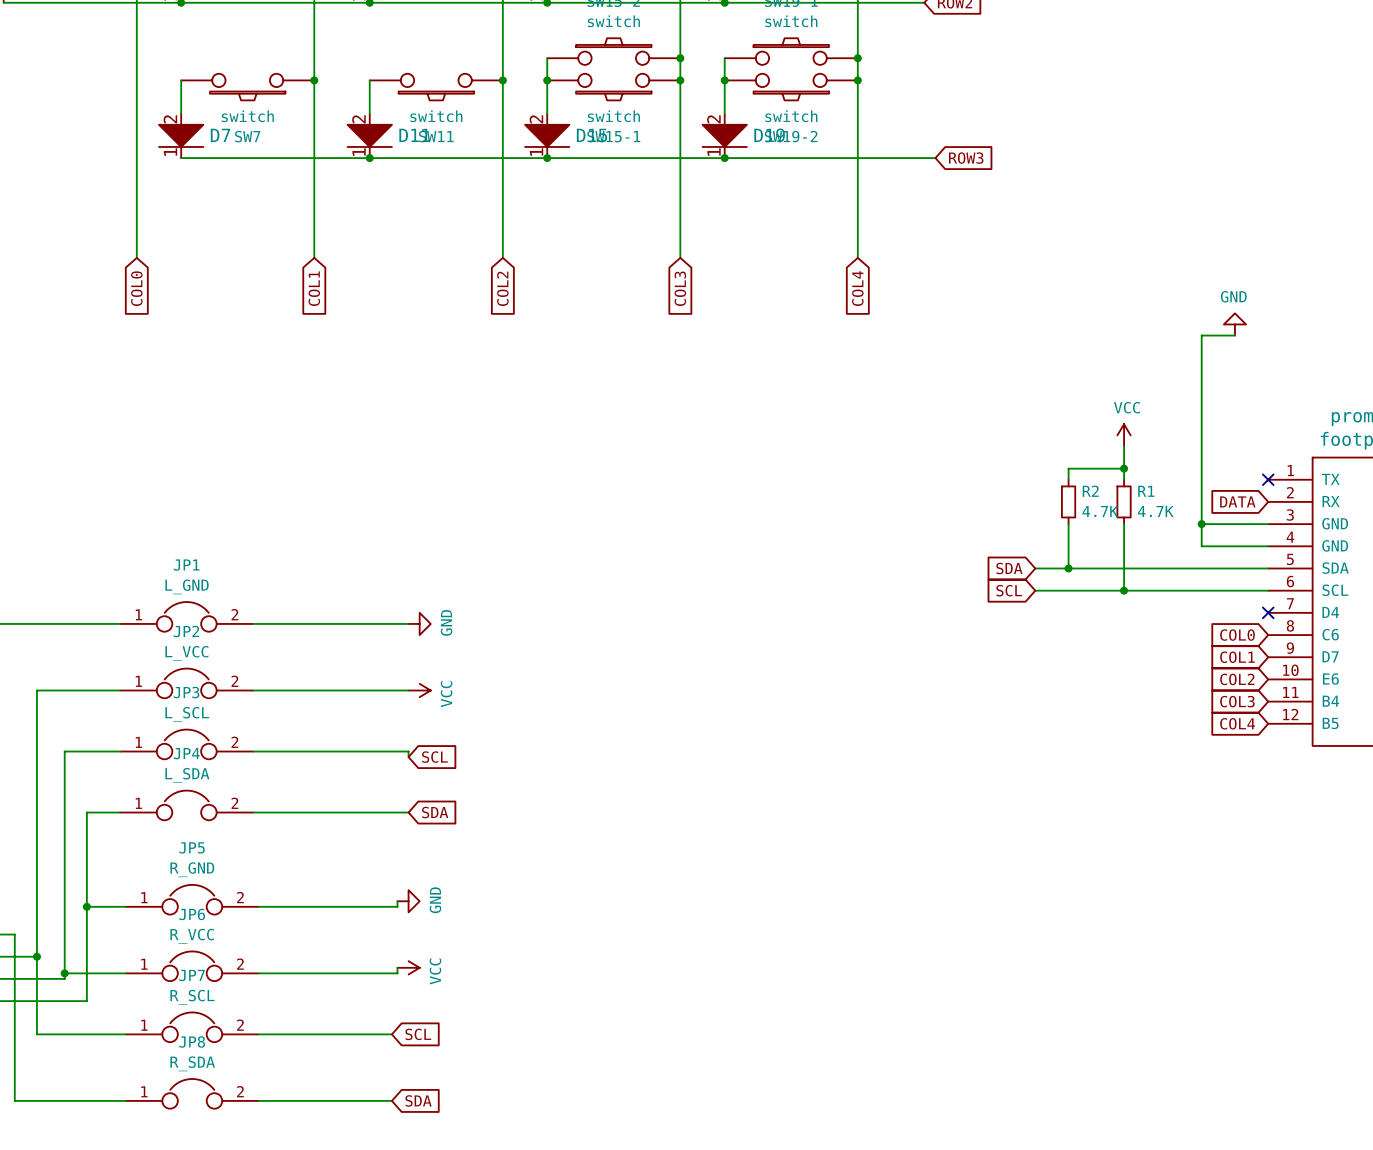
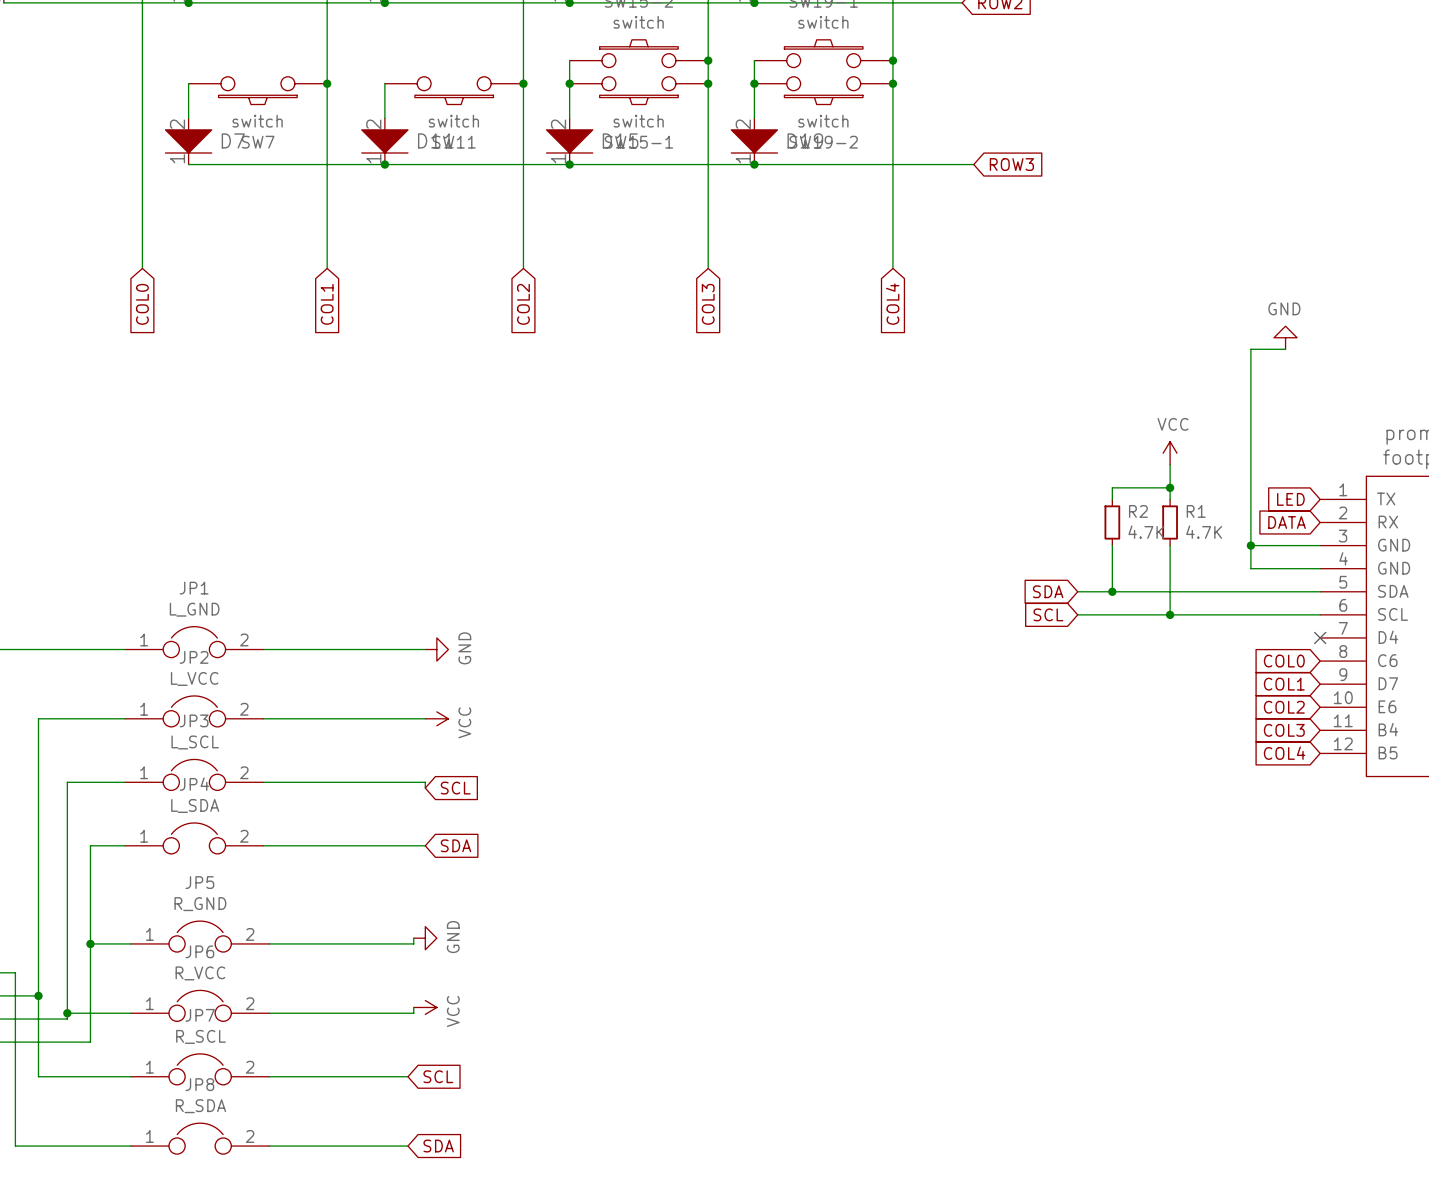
global label: none -> LED (1290, 499)
no-connect mark: (1268, 479) -> none

